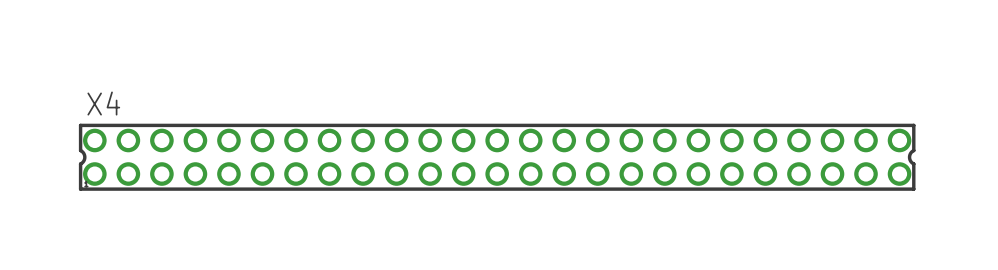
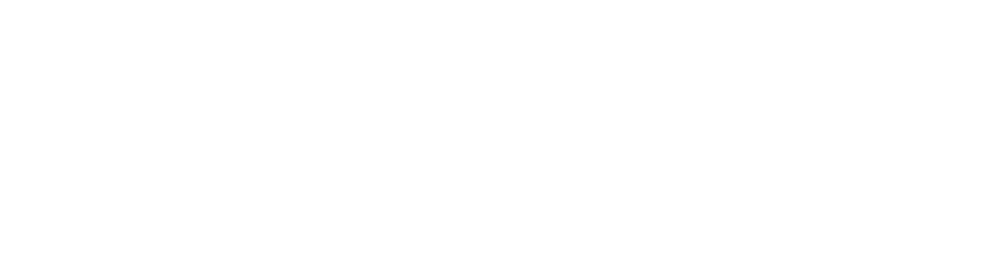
X4: (497, 157) -> none

